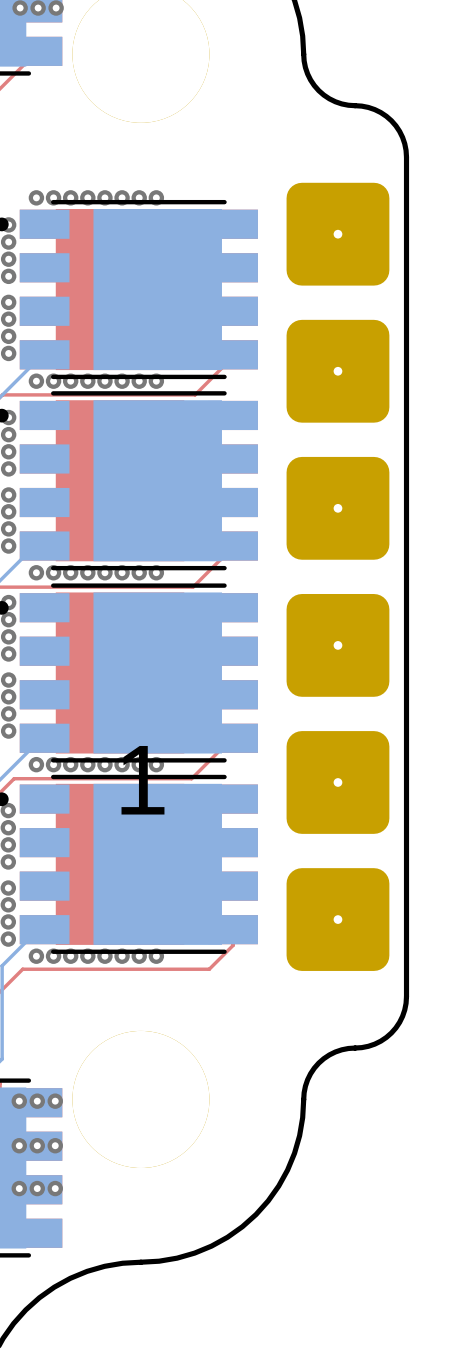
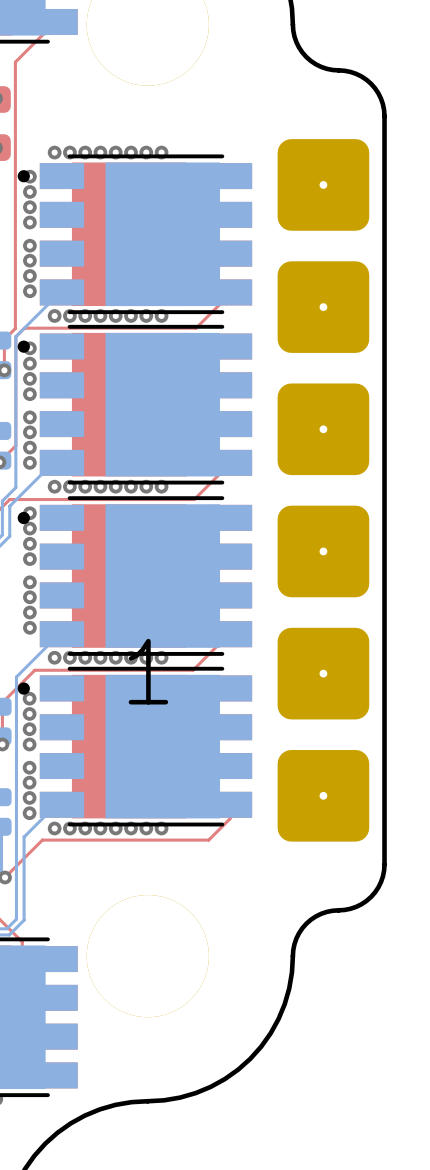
via: (19, 1101) -> none
via: (37, 1101) -> none
via: (55, 1101) -> none
via: (19, 1145) -> none
via: (37, 1145) -> none
via: (55, 1145) -> none
via: (19, 1188) -> none
via: (37, 1188) -> none
via: (55, 1188) -> none

